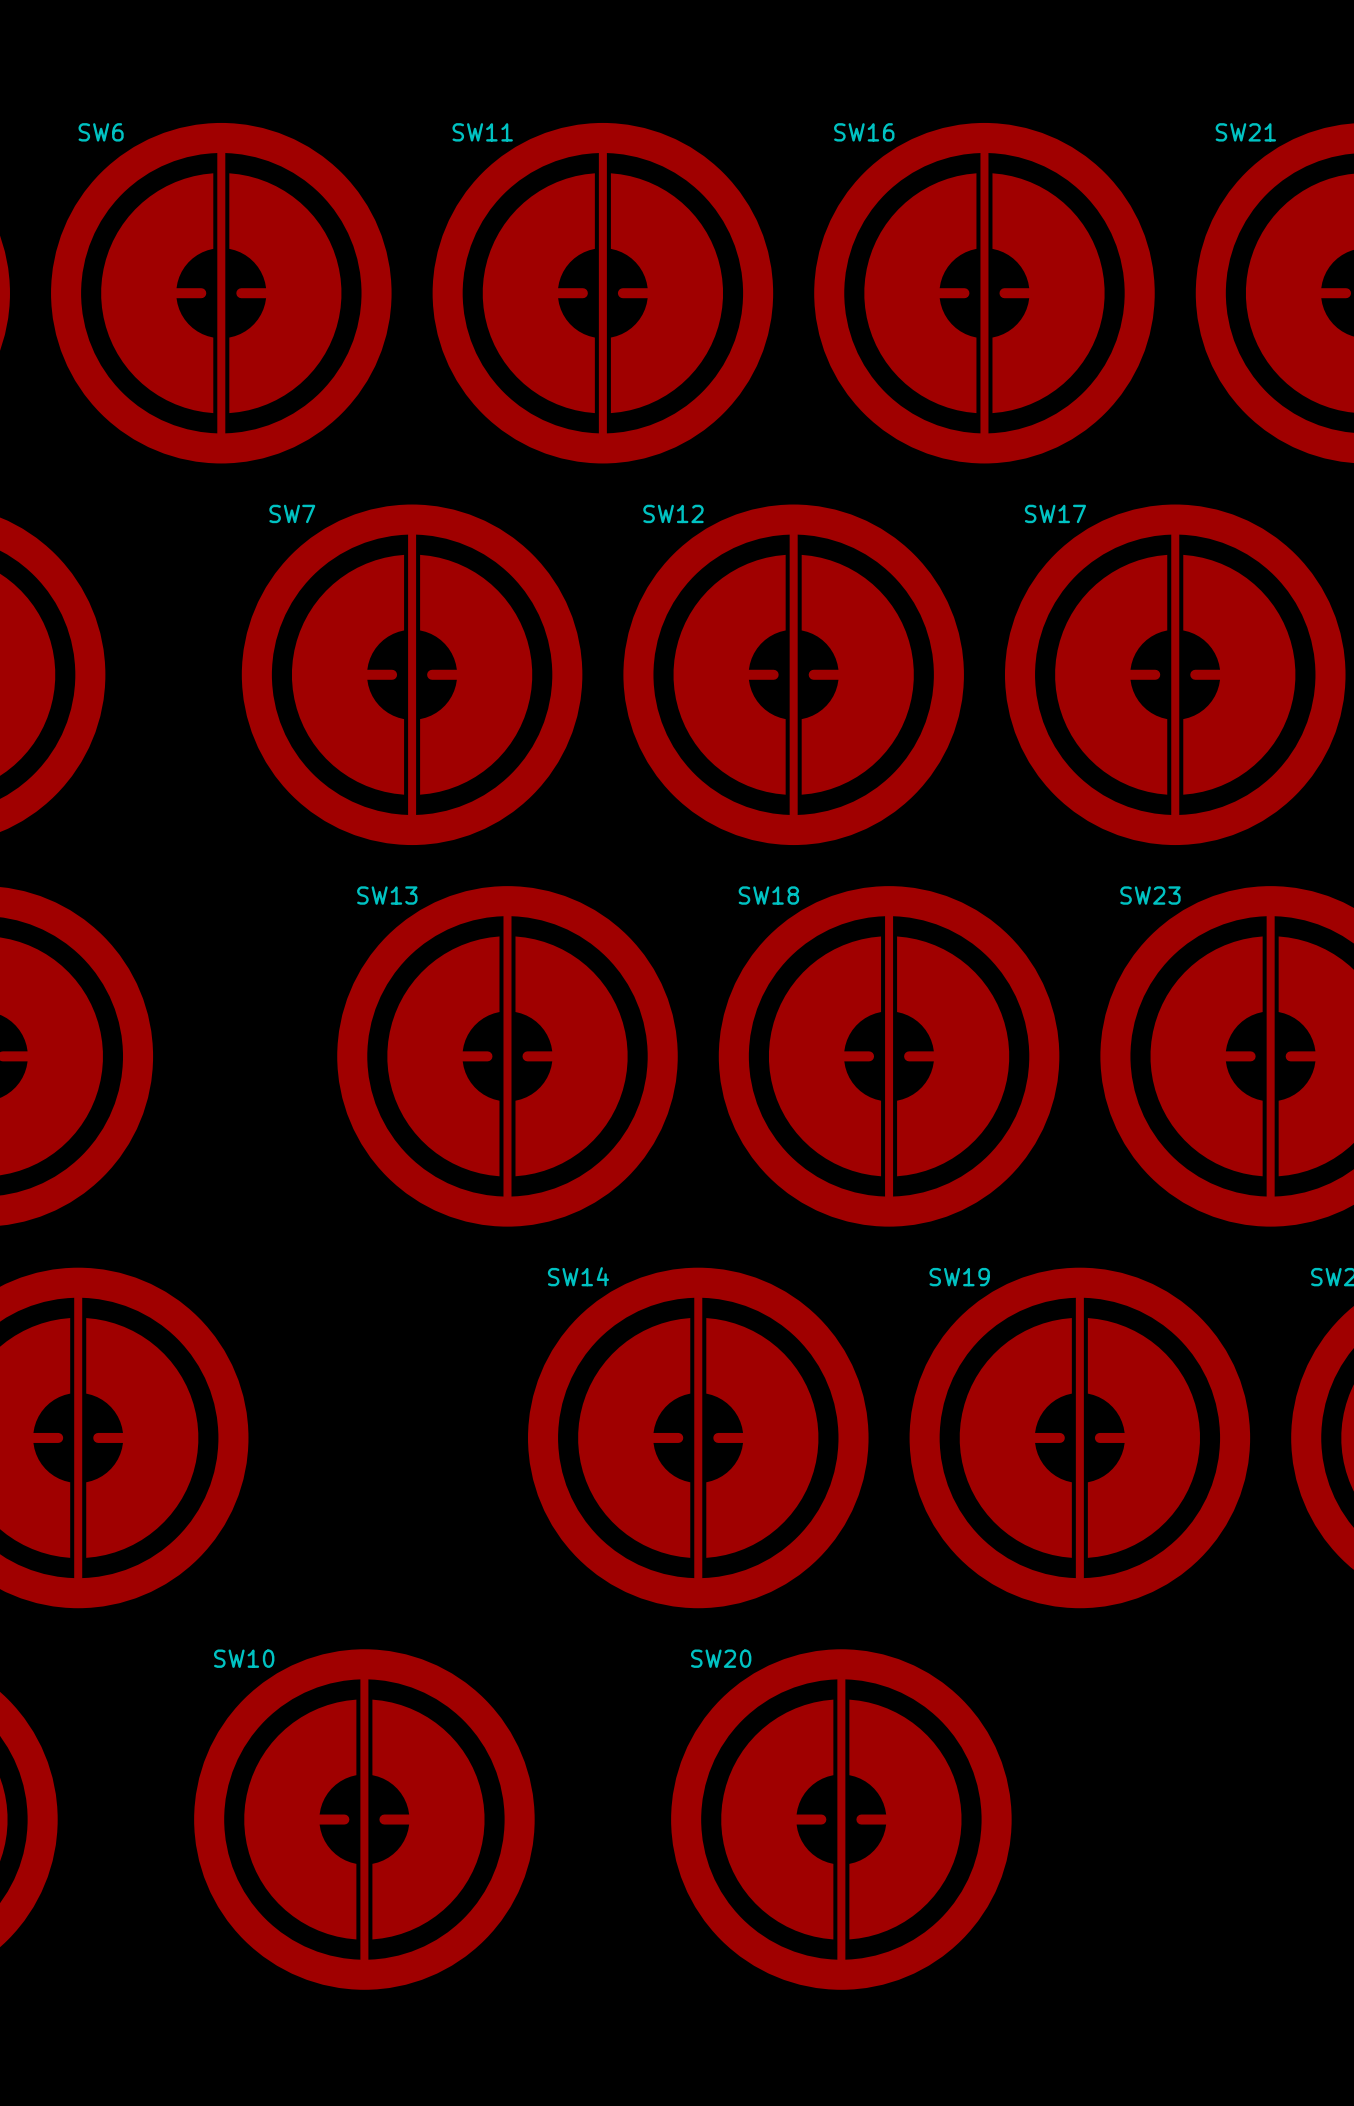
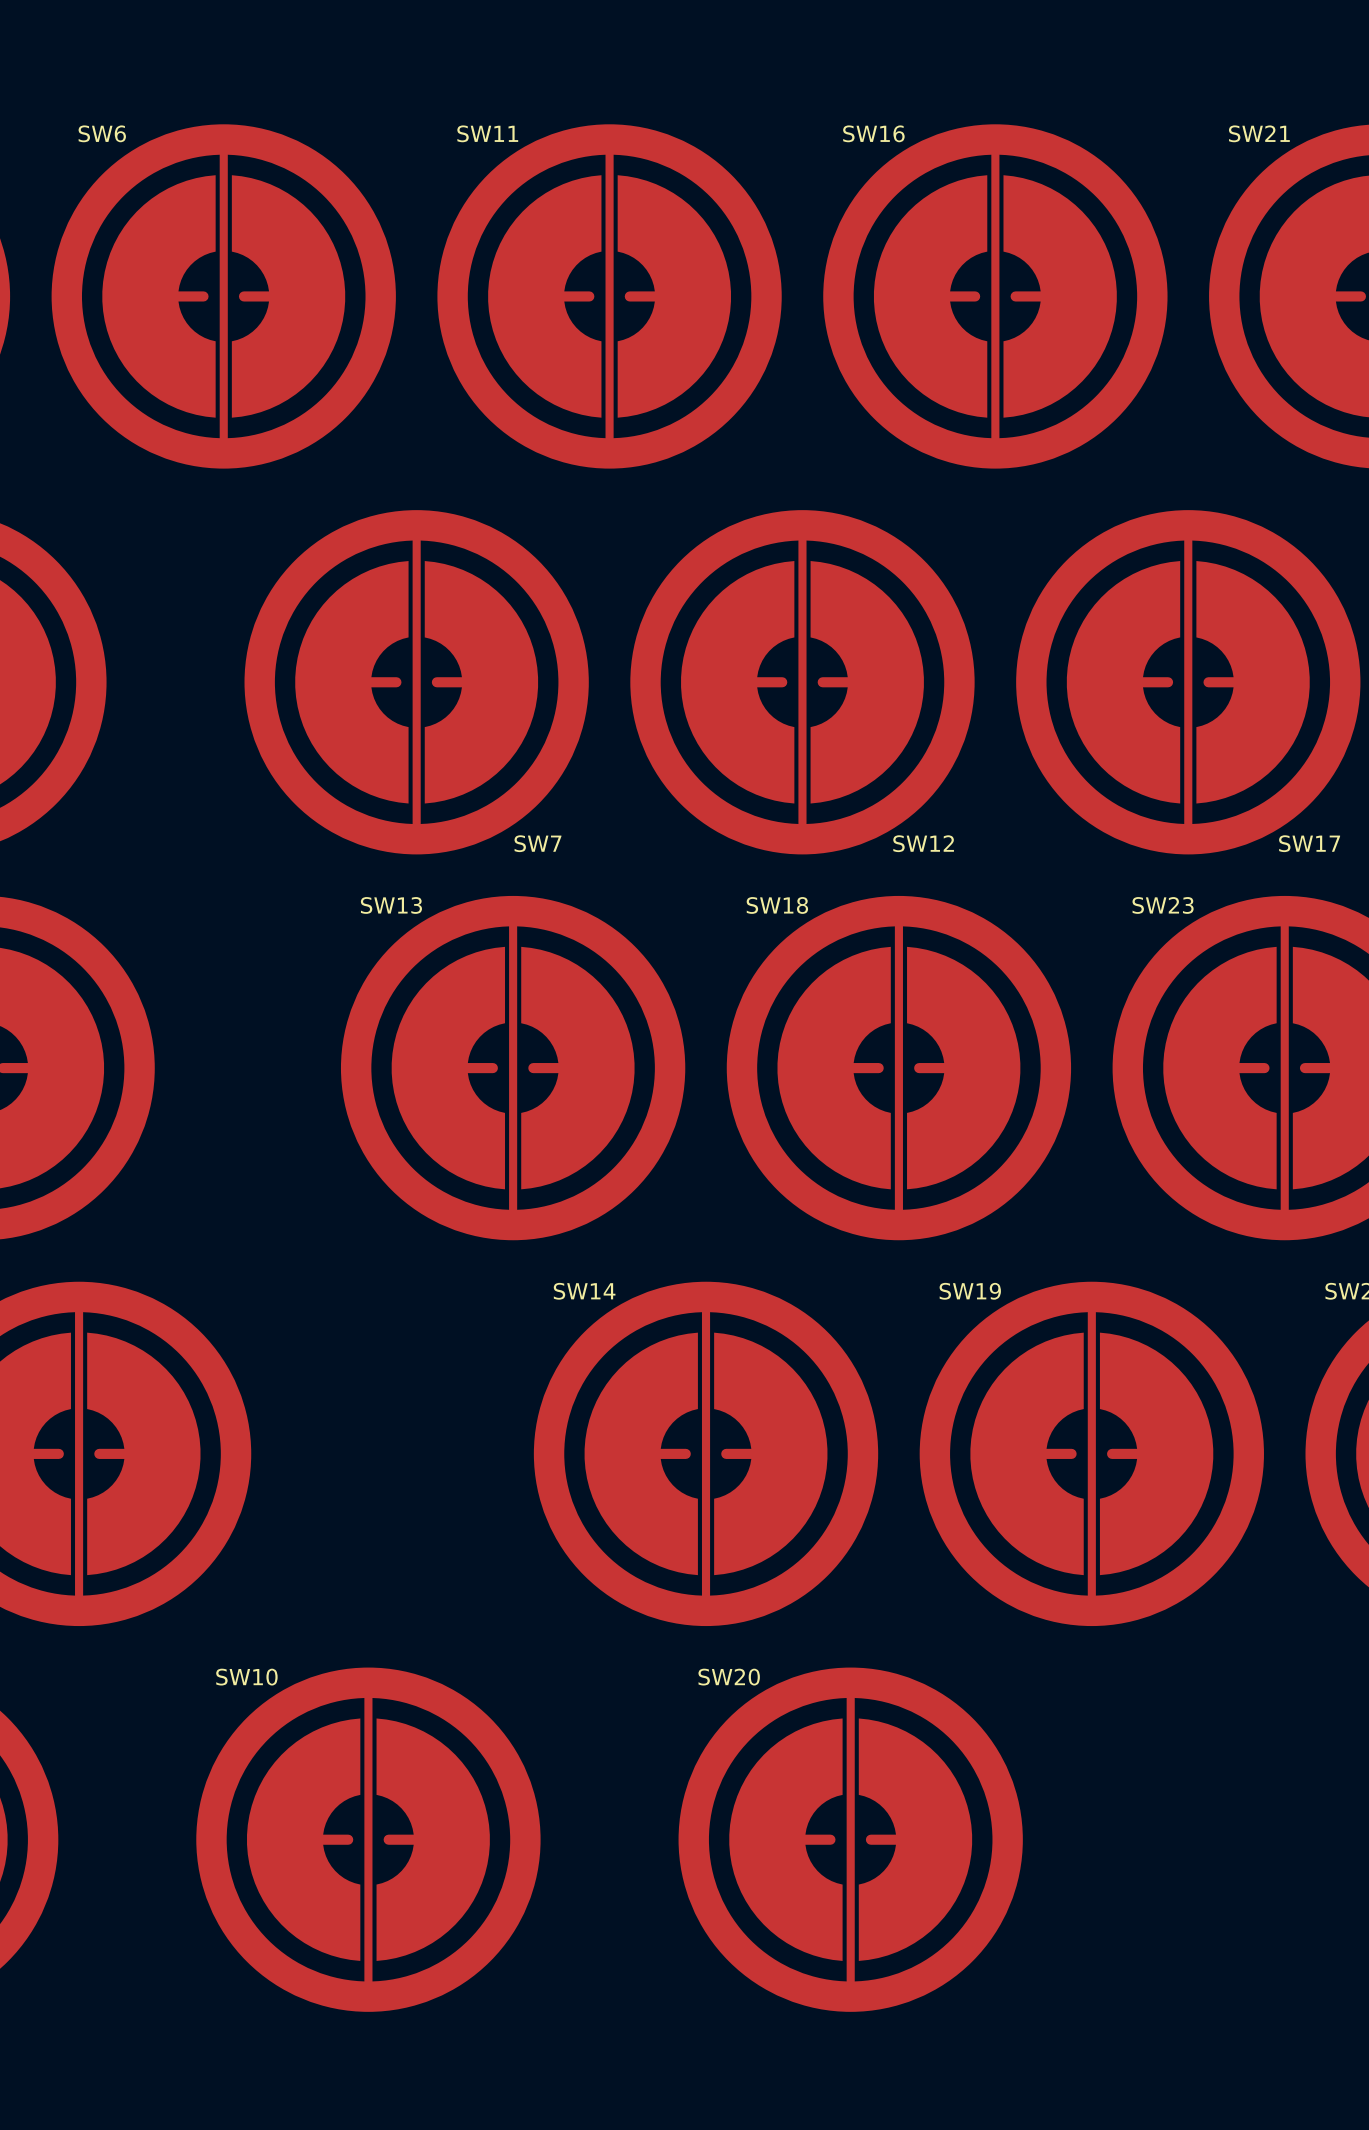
SW7 rotation: 0° (412, 674) -> 180° (416, 682)
SW12 rotation: 0° (793, 674) -> 180° (802, 682)
SW17 rotation: 0° (1175, 674) -> 180° (1188, 682)

